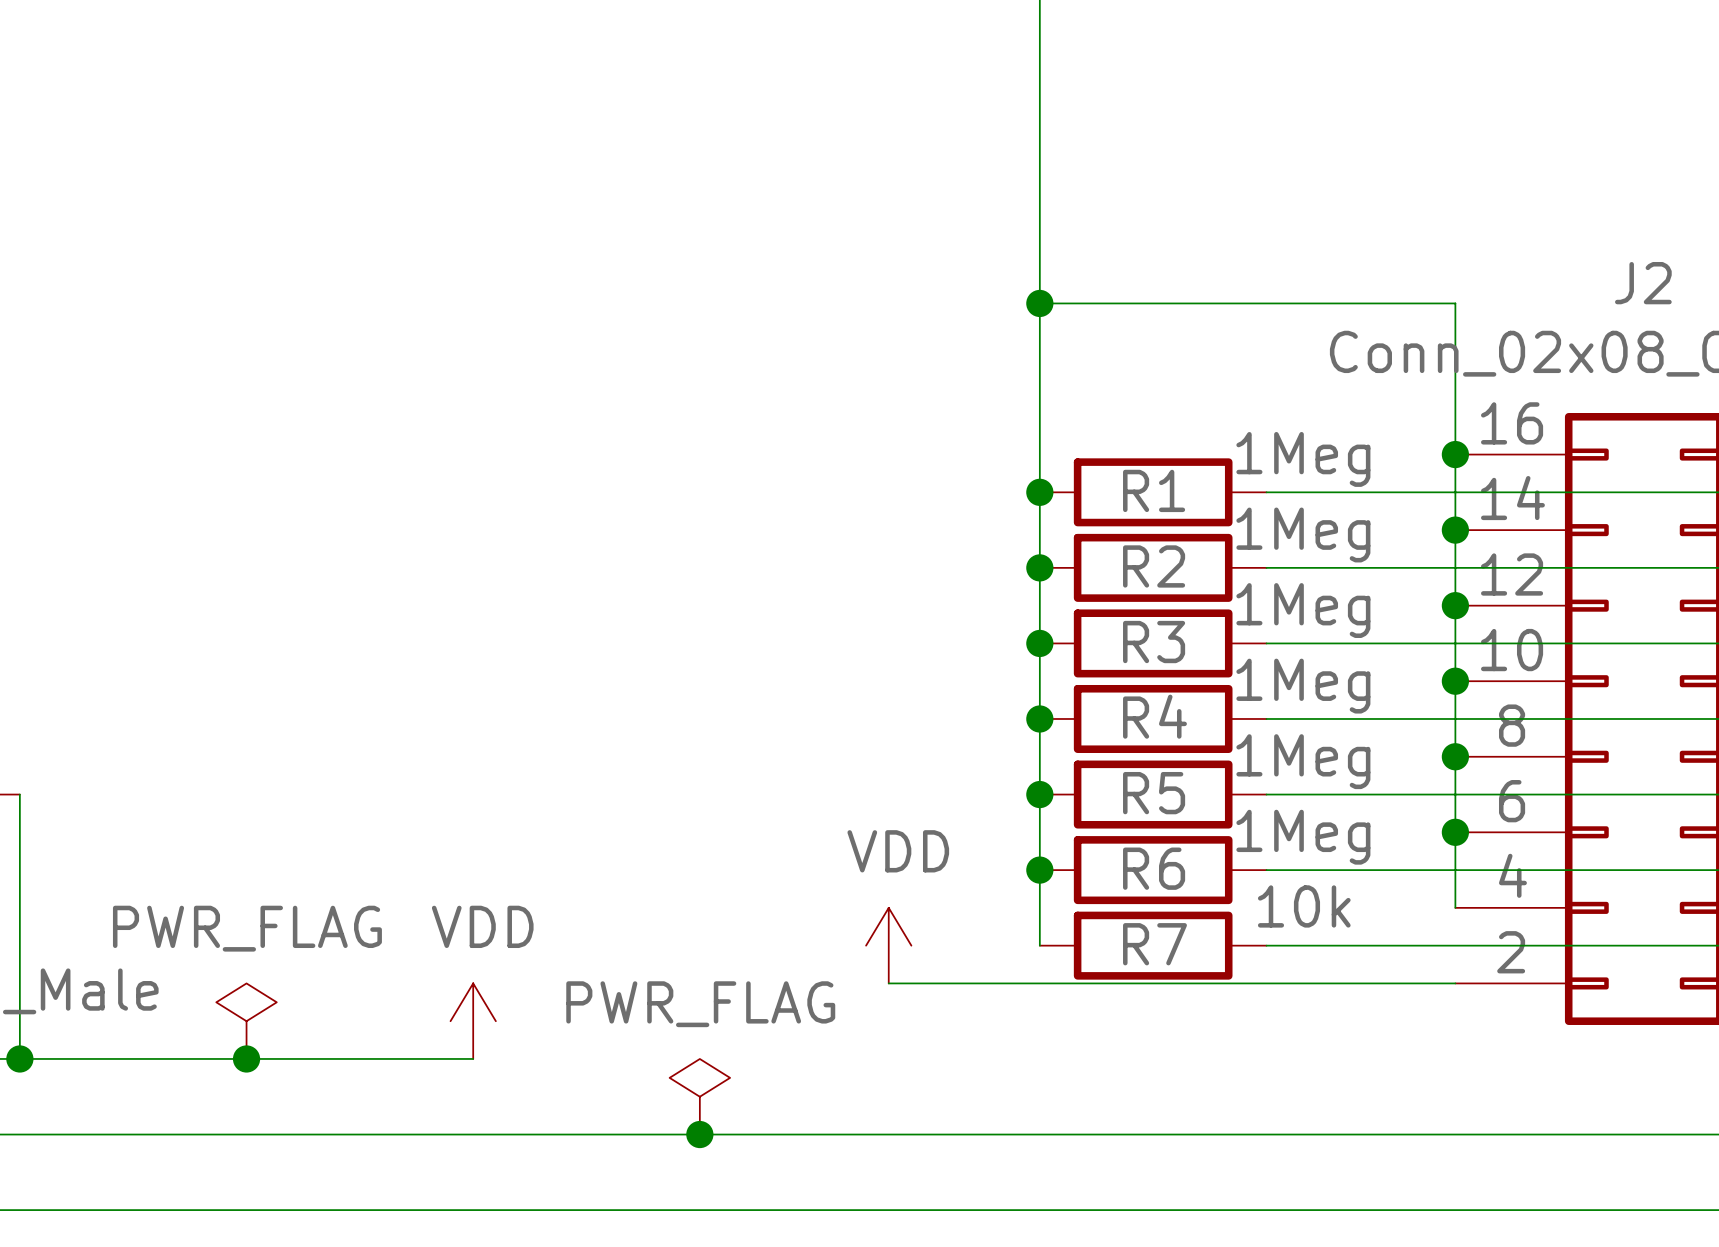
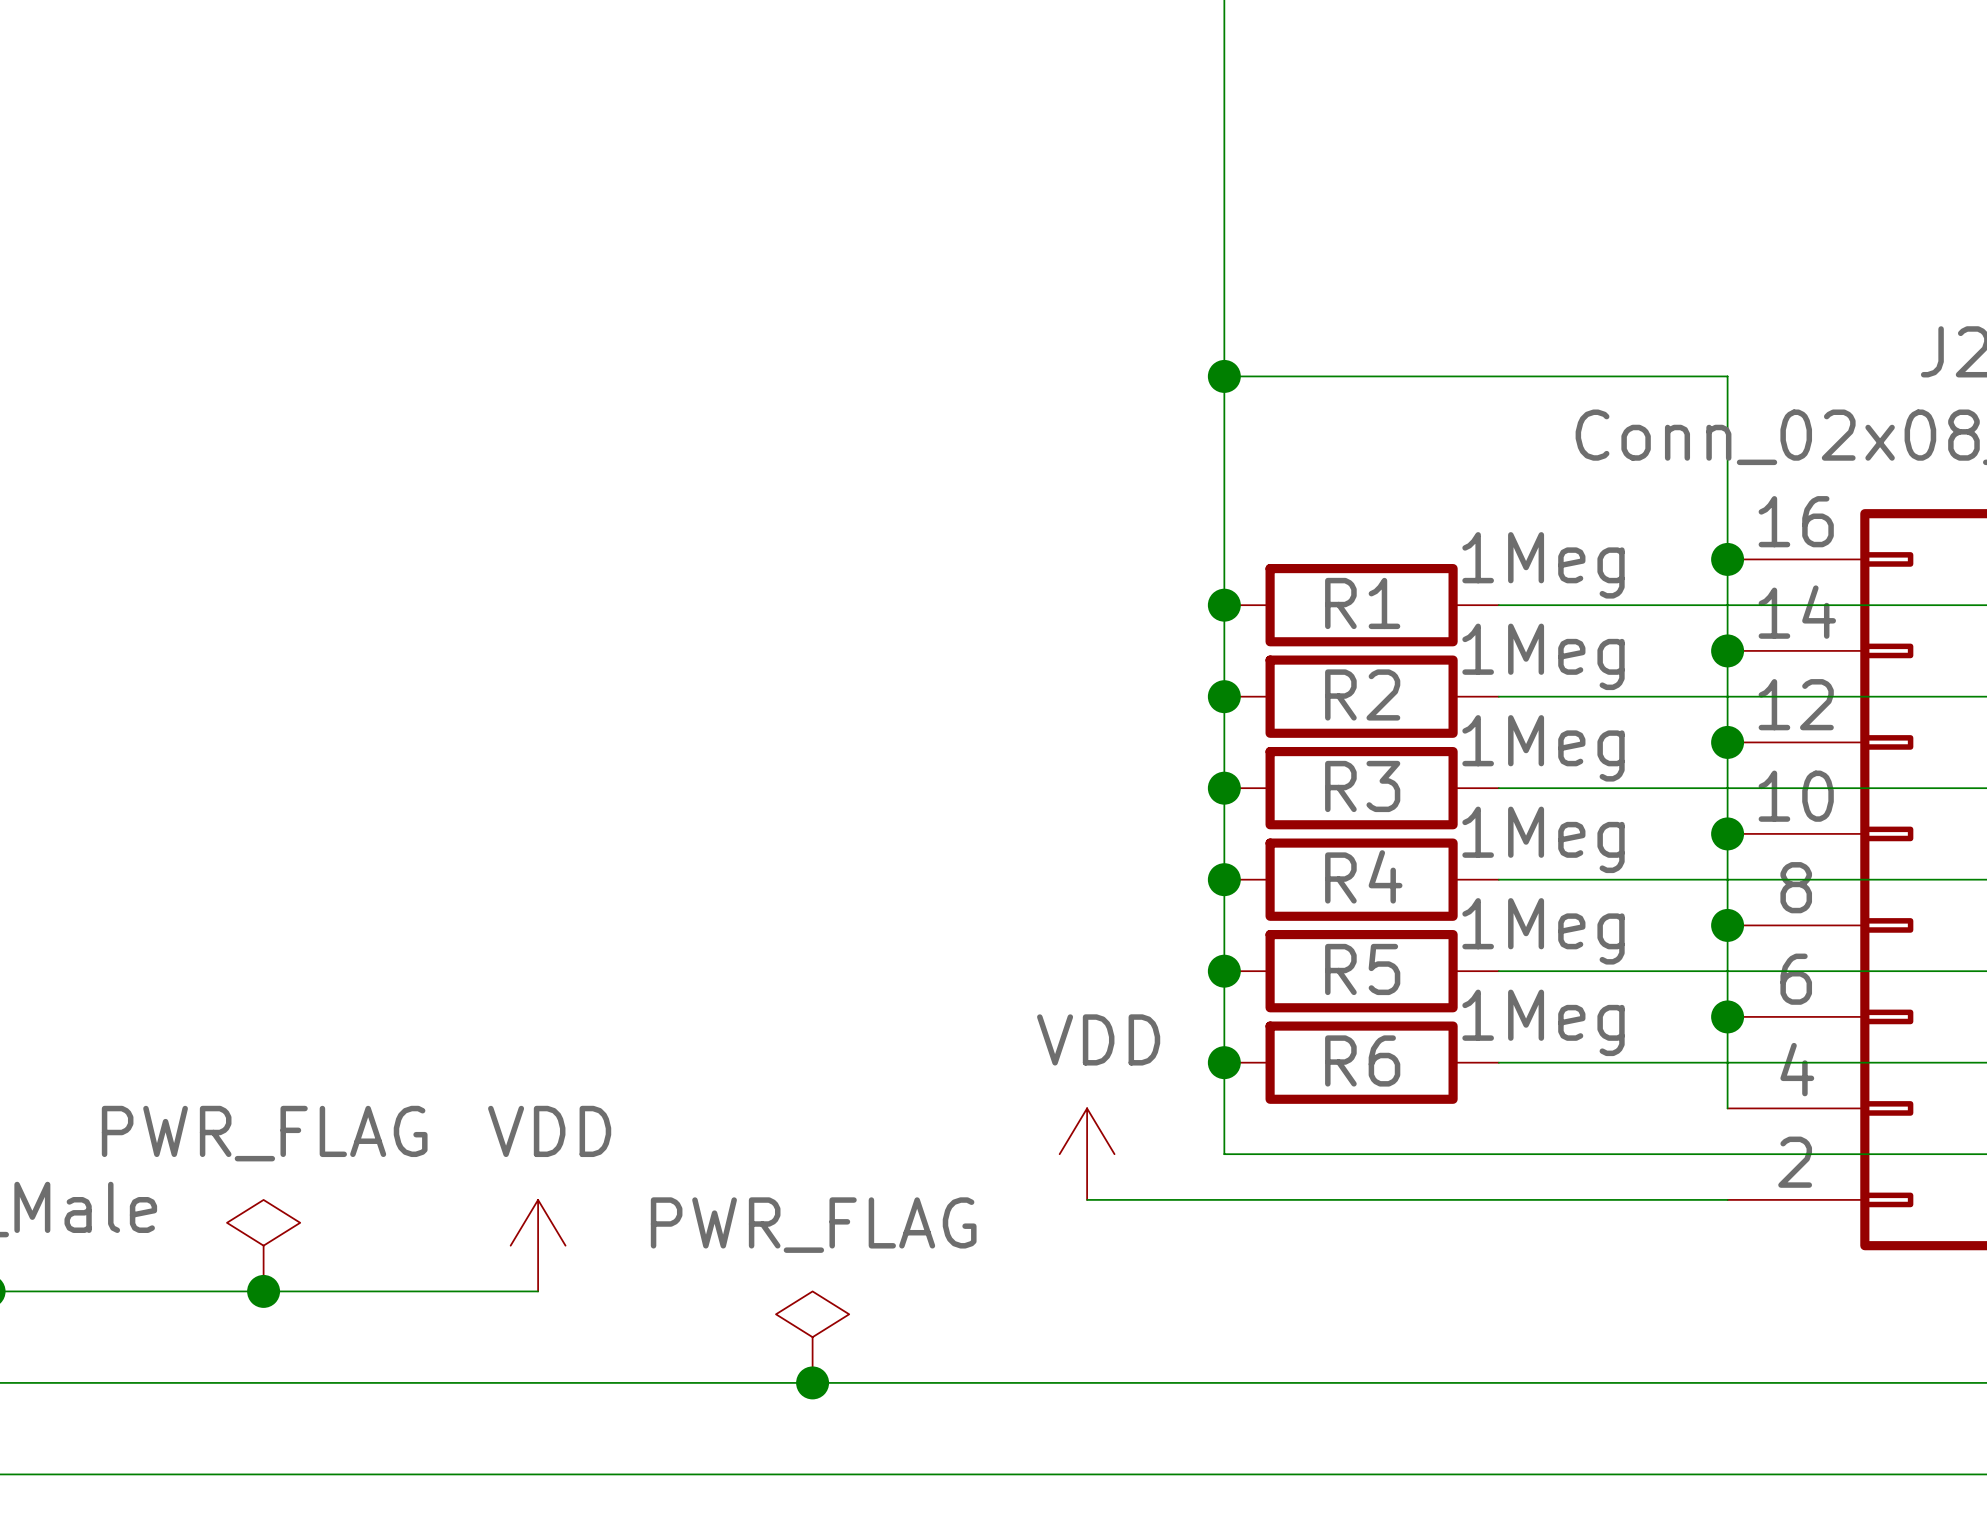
power symbol position: VDD (888, 945) -> VDD (1087, 1154)
wire: none -> (1224, 1154) (1498, 1154)
R7: 10k (1153, 945) -> none
wire: (888, 983) (926, 983) -> none

